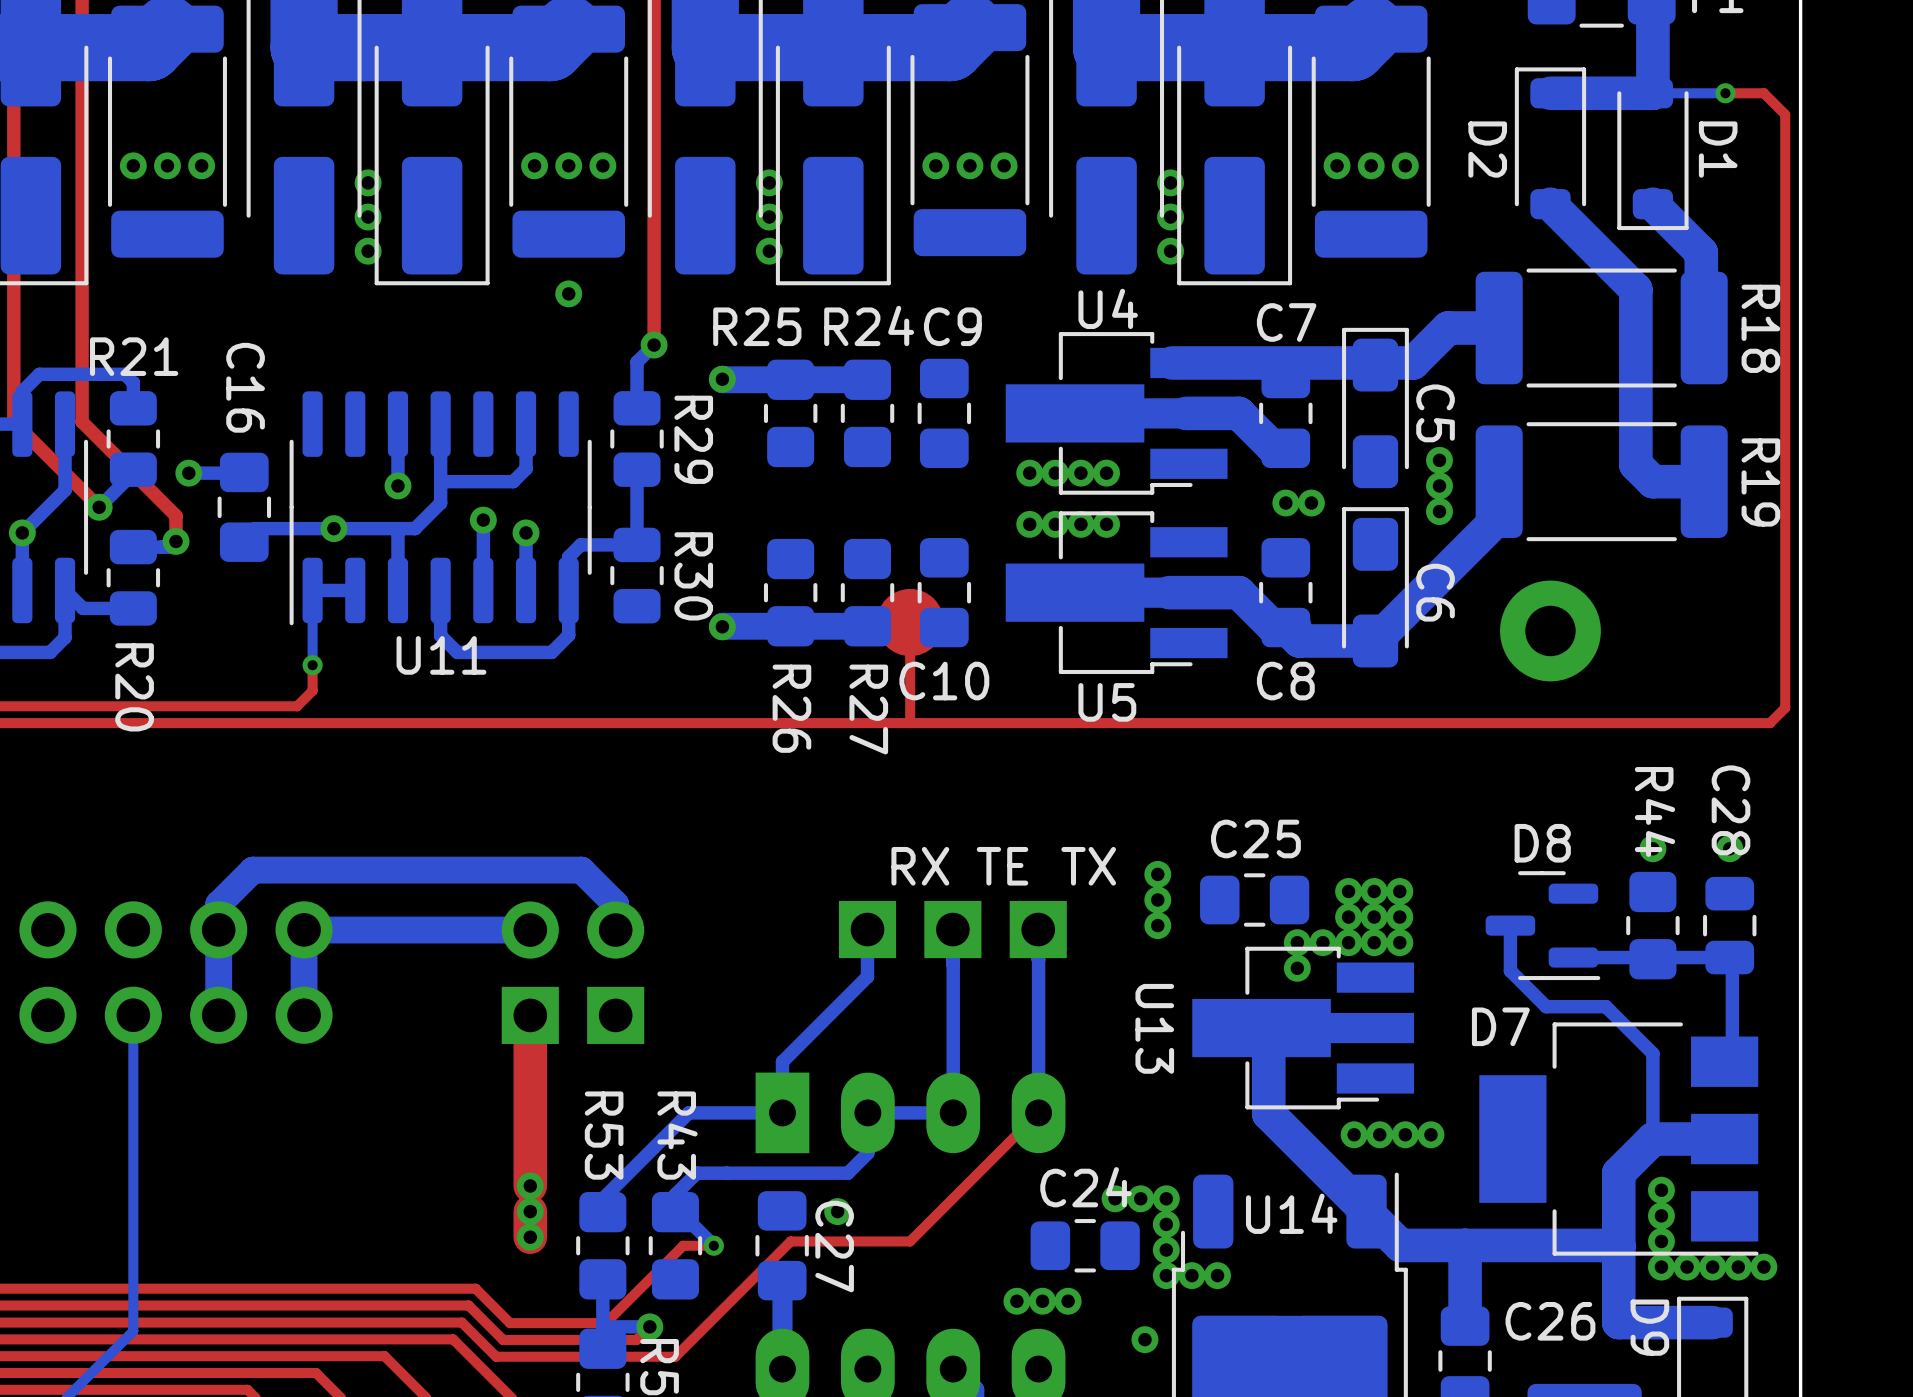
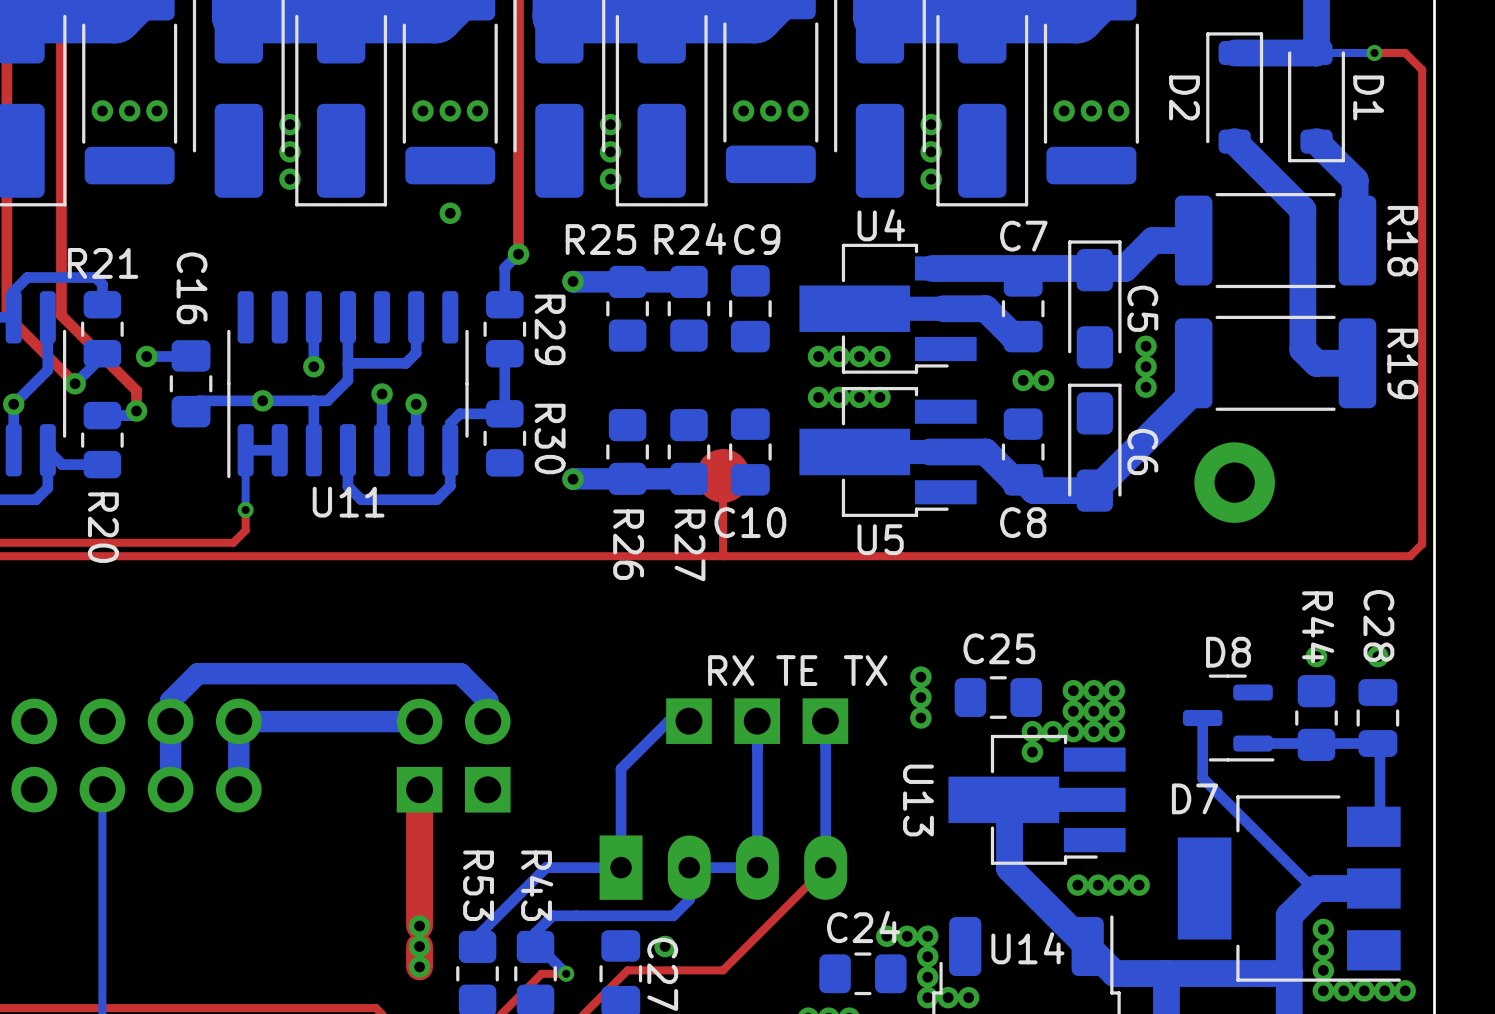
bottom track: (867, 929) (867, 976) (782, 1061) -> (688, 721) (668, 721) (621, 768) (621, 826)
bottom track: (1510, 970) (1546, 1006) (1605, 1006) (1652, 1053) (1652, 1139) -> (1202, 754) (1202, 778) (1313, 888) (1316, 888)

